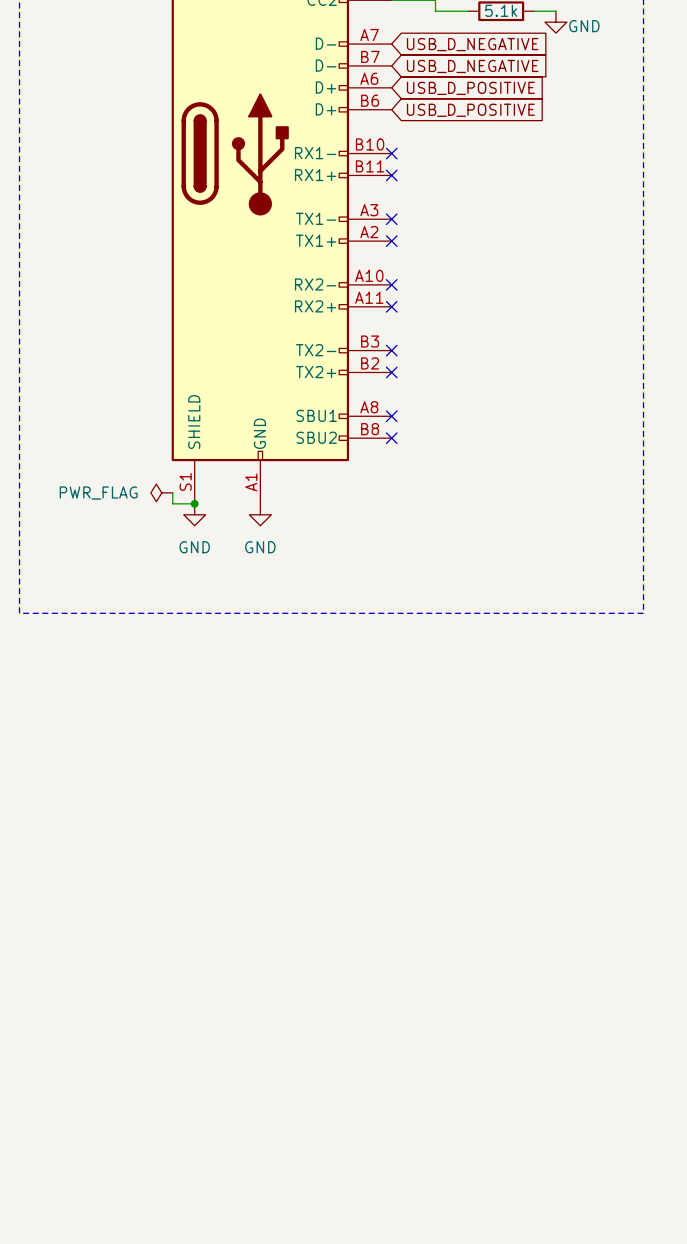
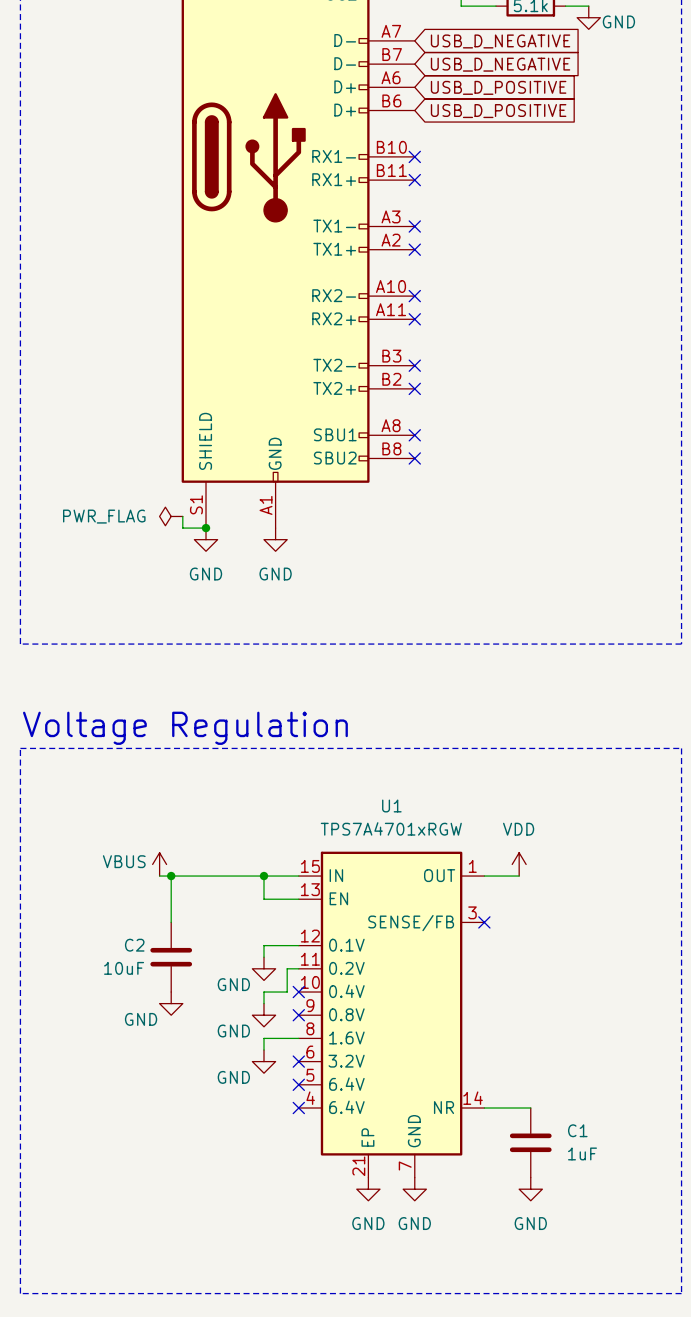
text: none -> Voltage Regulation (185, 728)
line: none -> (20, 748) (681, 748) (681, 1293) (20, 1293) (20, 748)
power symbol: none -> VBUS (159, 864)
power symbol: none -> VDD (519, 864)
wire: none -> (159, 876) (298, 876)
wire: none -> (171, 876) (171, 922)
junction: none -> (171, 876)
wire: none -> (263, 876) (263, 899) (298, 899)
junction: none -> (263, 876)
wire: none -> (484, 876) (519, 876)
no-connect mark: none -> (484, 922)
wire: none -> (298, 945) (263, 945) (263, 957)
C2: none -> 10uF (171, 957)
power symbol: none -> GND (263, 968)
wire: none -> (298, 968) (287, 968) (287, 992) (263, 992) (263, 1003)
no-connect mark: none -> (298, 992)
power symbol: none -> GND (171, 1003)
power symbol: none -> GND (263, 1015)
no-connect mark: none -> (298, 1015)
U1: none -> TPS7A4701xRGW (391, 1014)
wire: none -> (298, 1038) (263, 1038) (263, 1050)
power symbol: none -> GND (263, 1061)
no-connect mark: none -> (298, 1061)
no-connect mark: none -> (298, 1084)
no-connect mark: none -> (298, 1108)
wire: none -> (484, 1108) (530, 1108)
C1: none -> 1uF (530, 1142)
power symbol: none -> GND (368, 1189)
power symbol: none -> GND (414, 1189)
power symbol: none -> GND (530, 1189)

